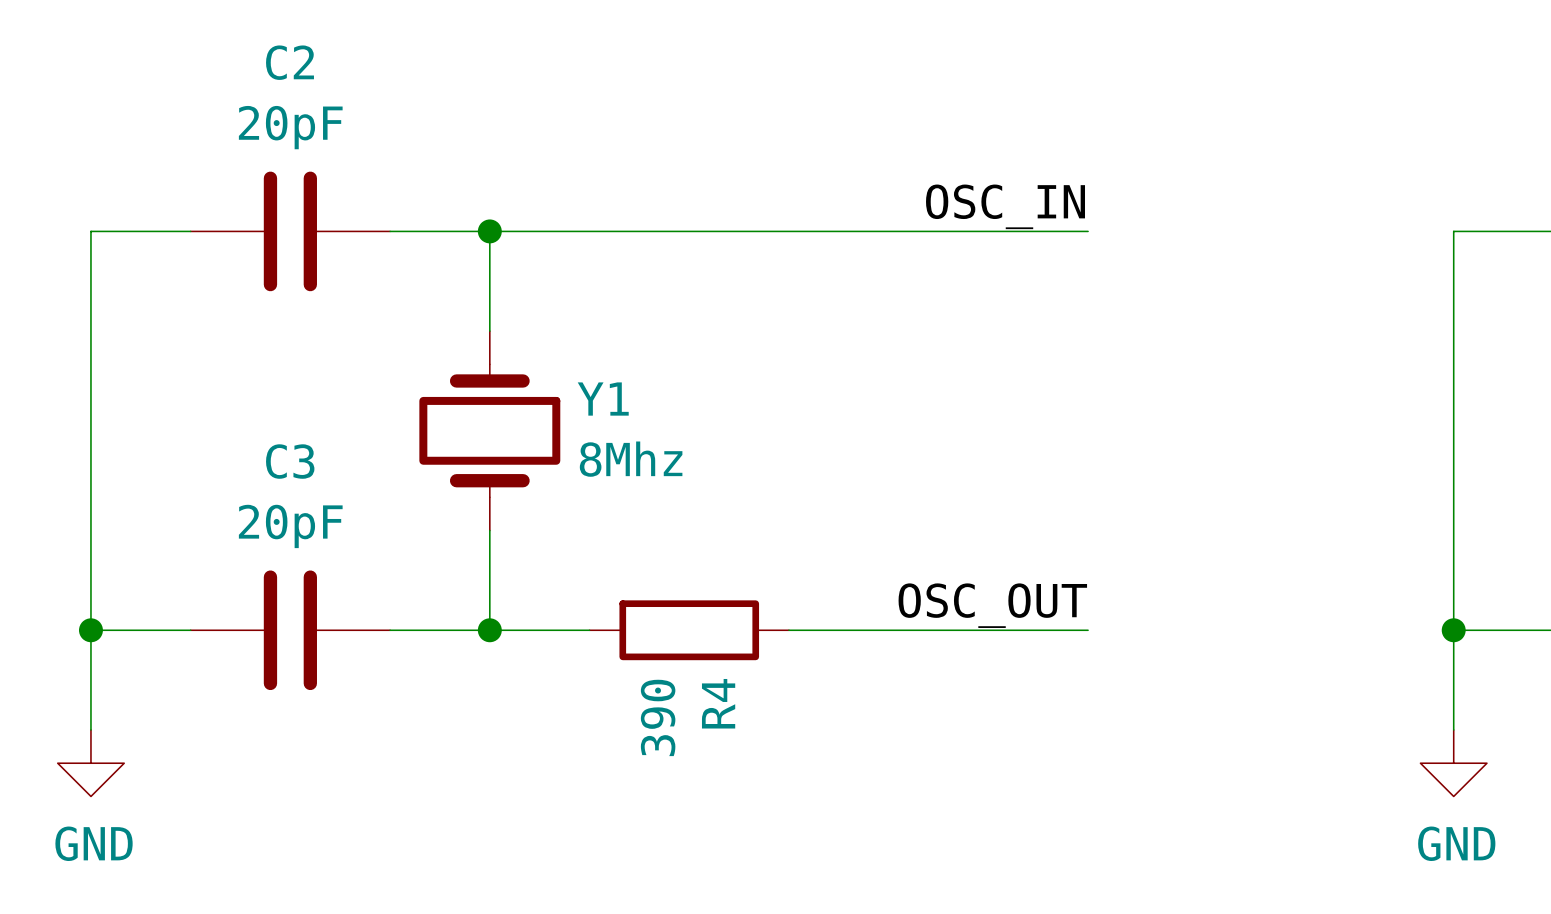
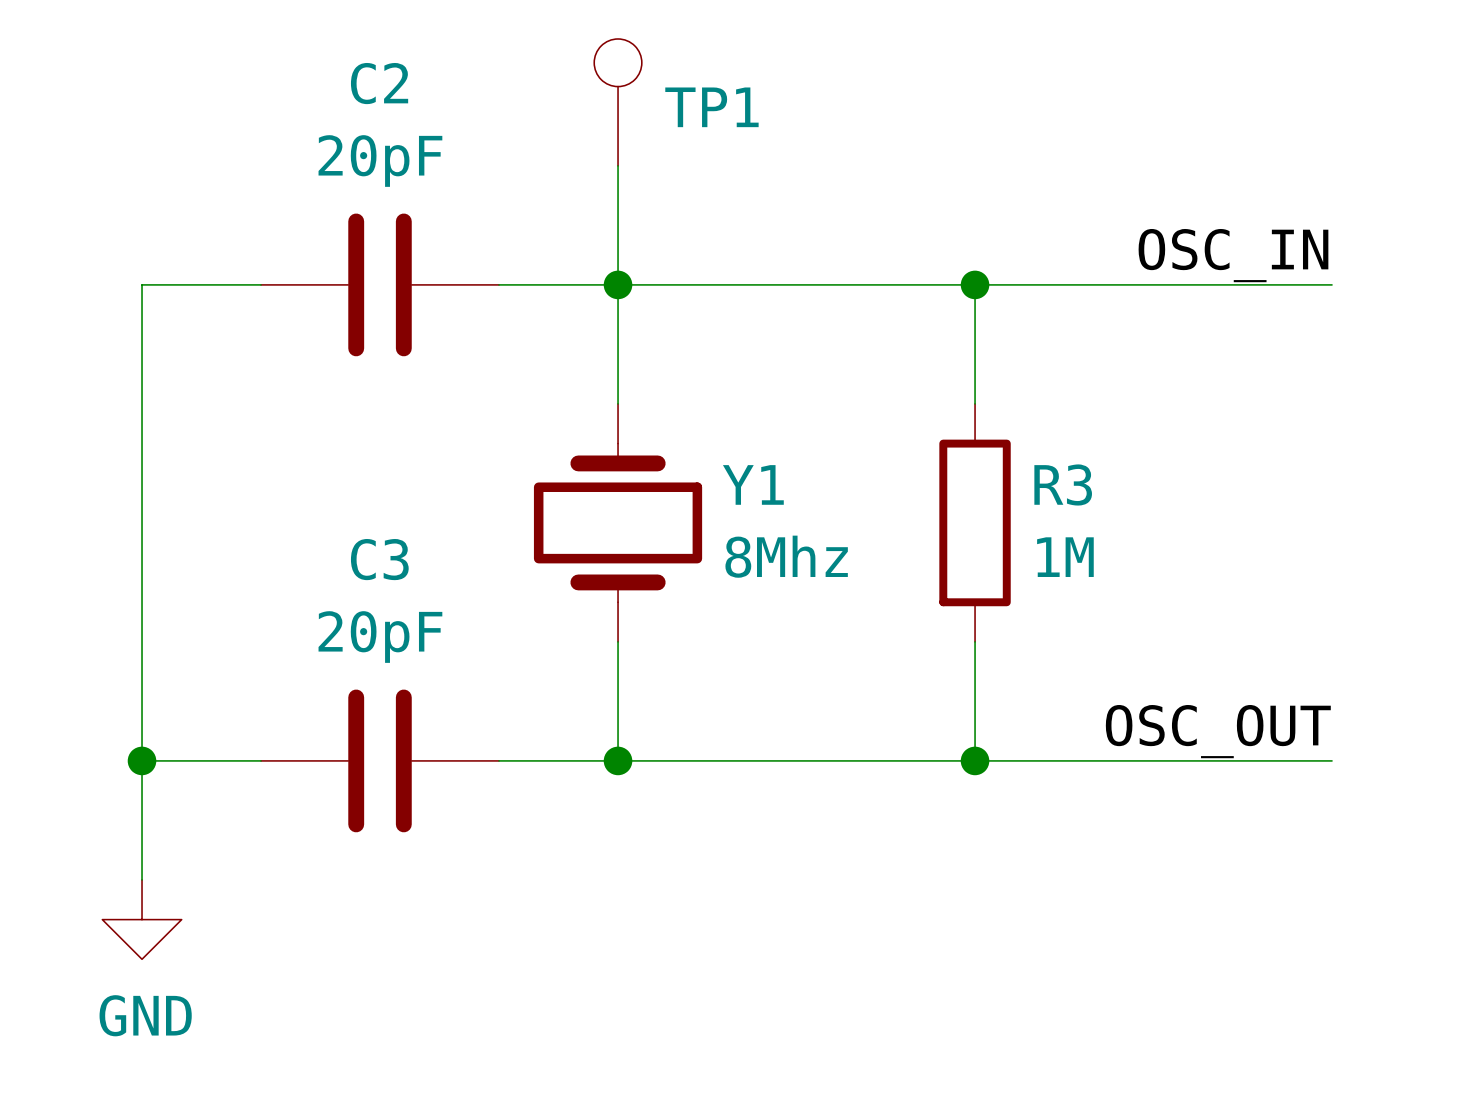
TP1: none -> (618, 102)
wire: none -> (618, 165) (618, 284)
wire: none -> (975, 284) (975, 403)
junction: none -> (975, 284)
R3: none -> 1M (975, 522)
wire: none -> (975, 641) (975, 760) (737, 760)
R4: 390 (689, 630) -> none
junction: none -> (975, 760)

